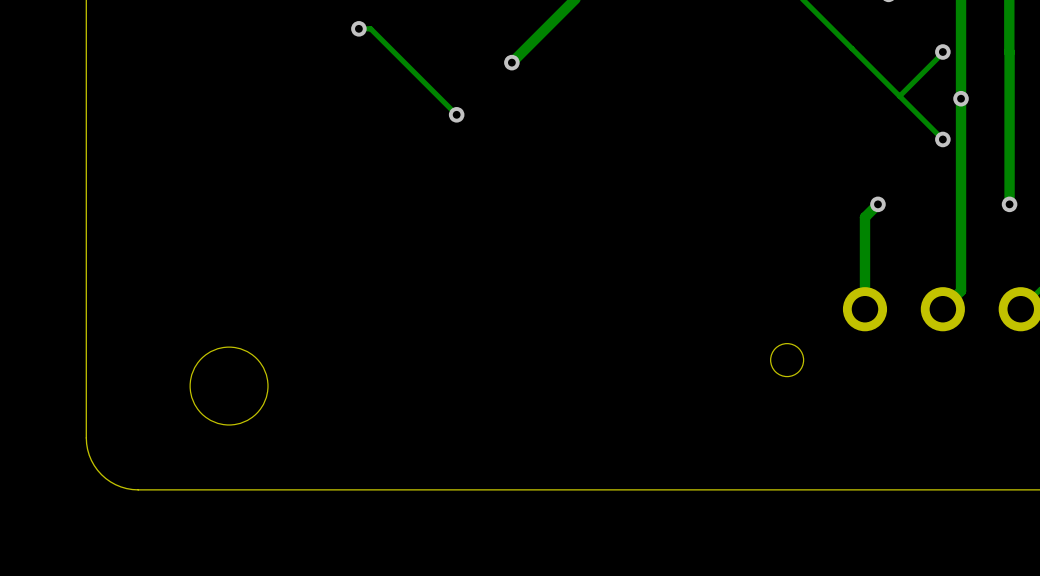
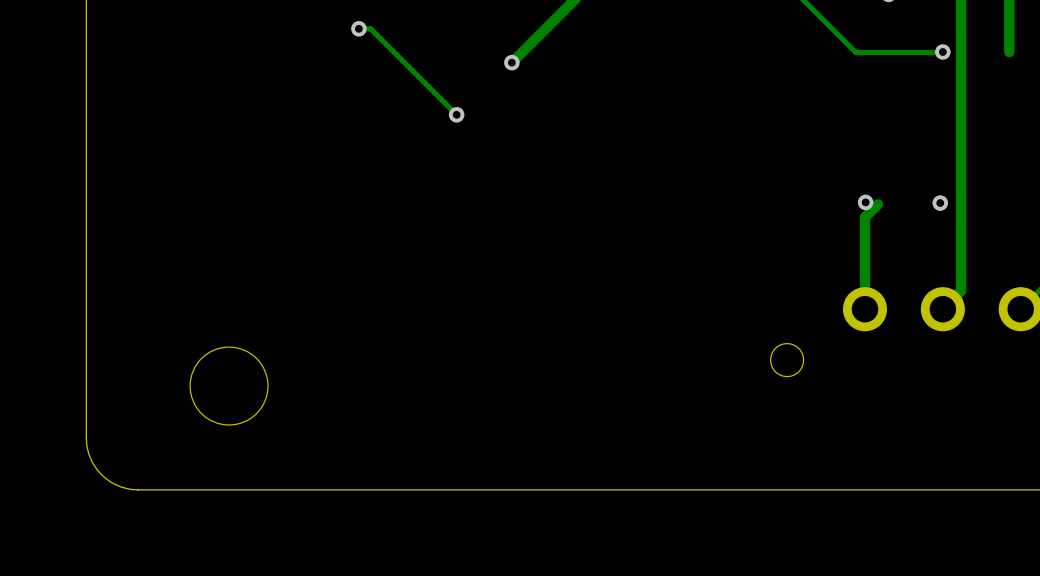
track: (942, 51) (899, 96) -> (942, 51) (855, 52)
track: (855, 52) (942, 139) -> none
track: (1009, 52) (1009, 204) -> none
via: (961, 98) -> none
via: (942, 139) -> none
via: none -> (940, 203)
via position: (877, 204) -> (865, 202)
via: (1009, 204) -> none

